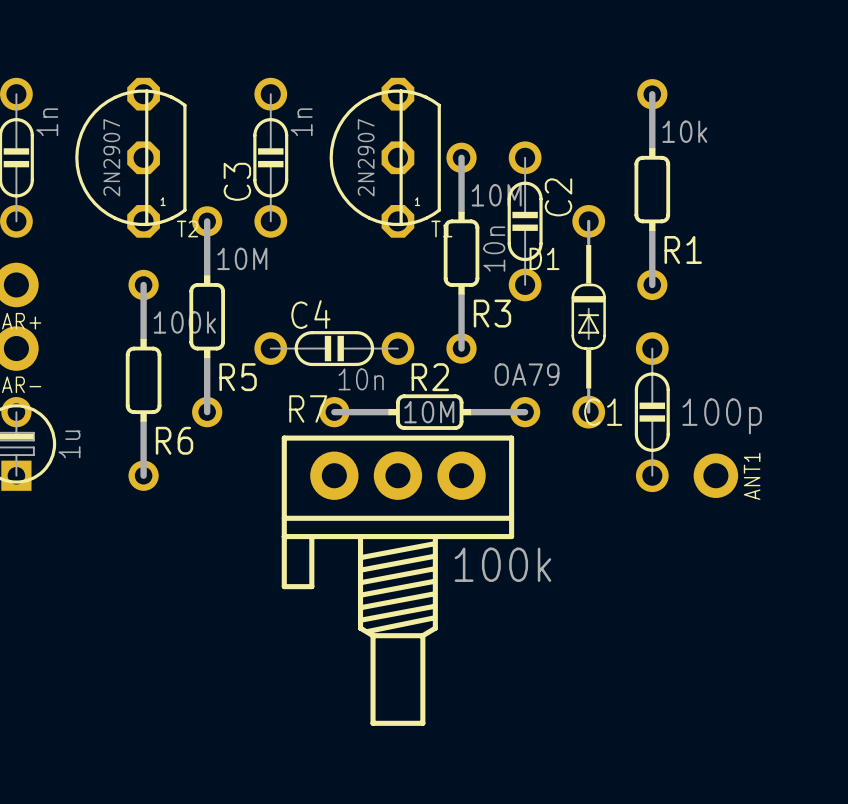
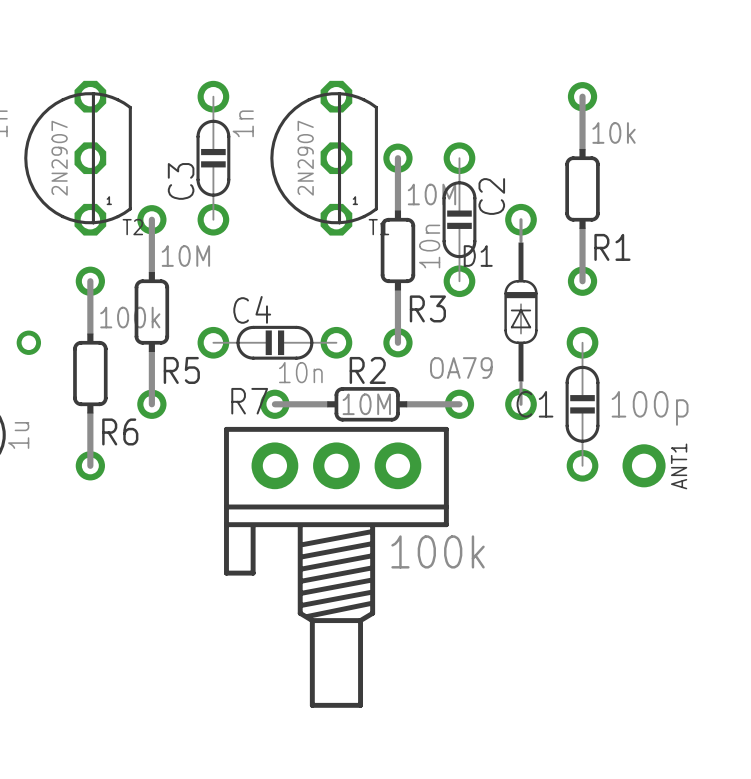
via: none -> (28, 342)

